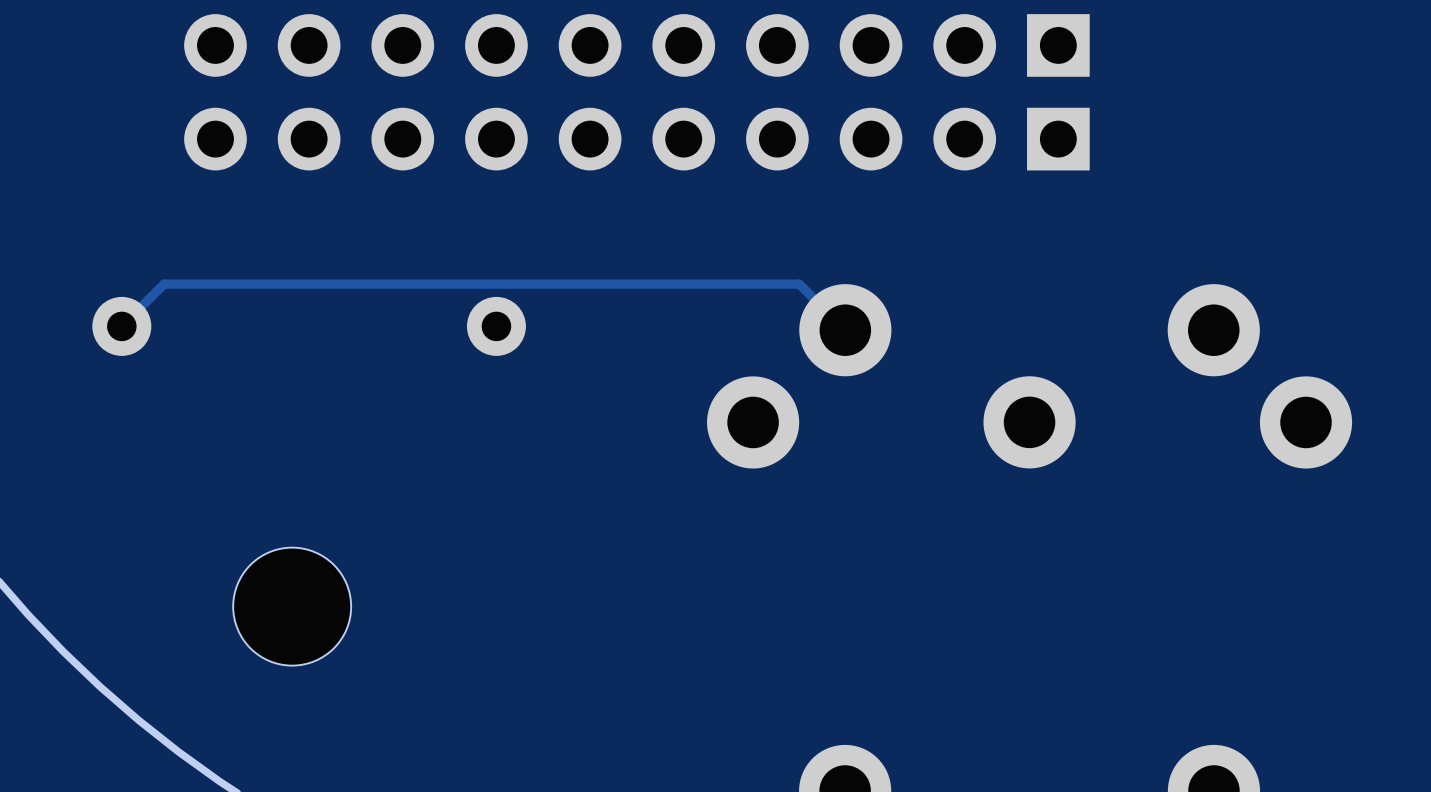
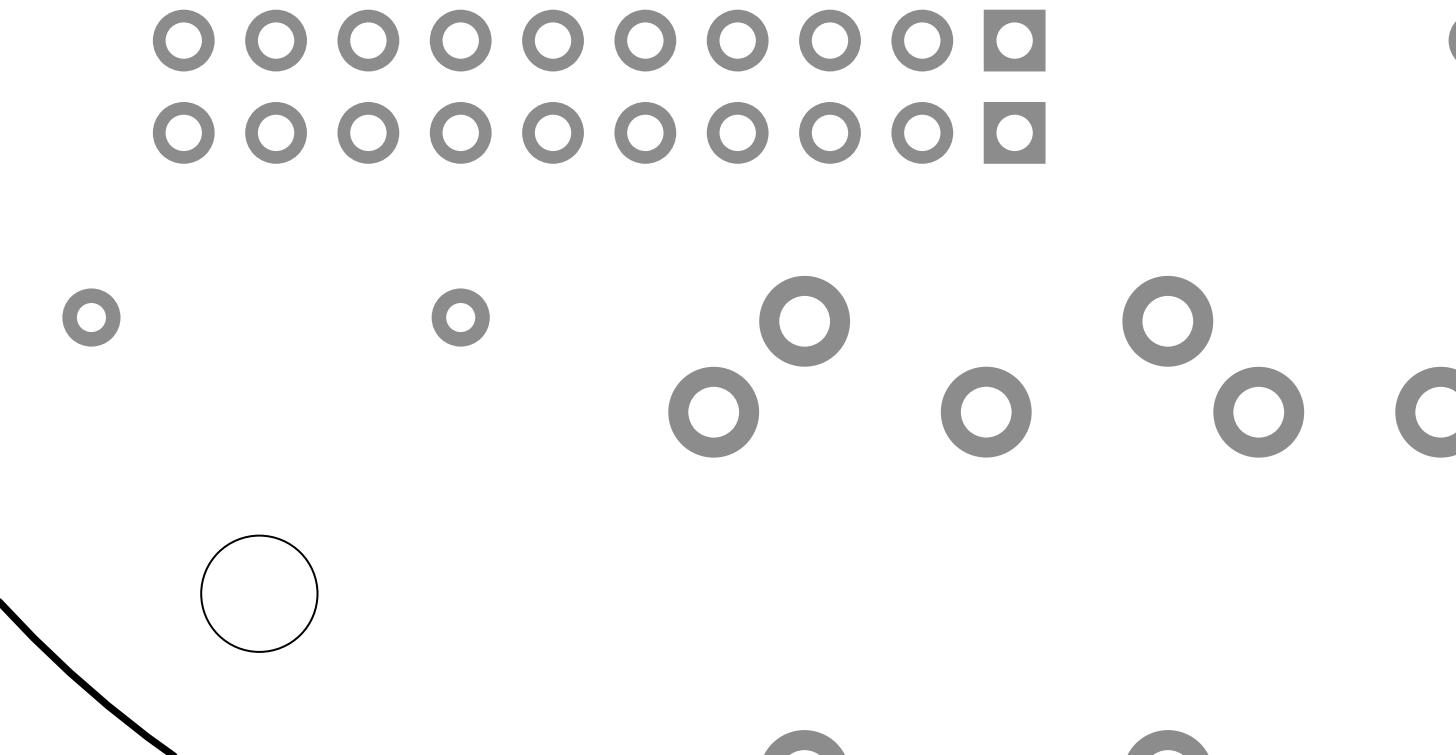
track: (121, 326) (164, 284) (799, 284) (845, 330) -> none

